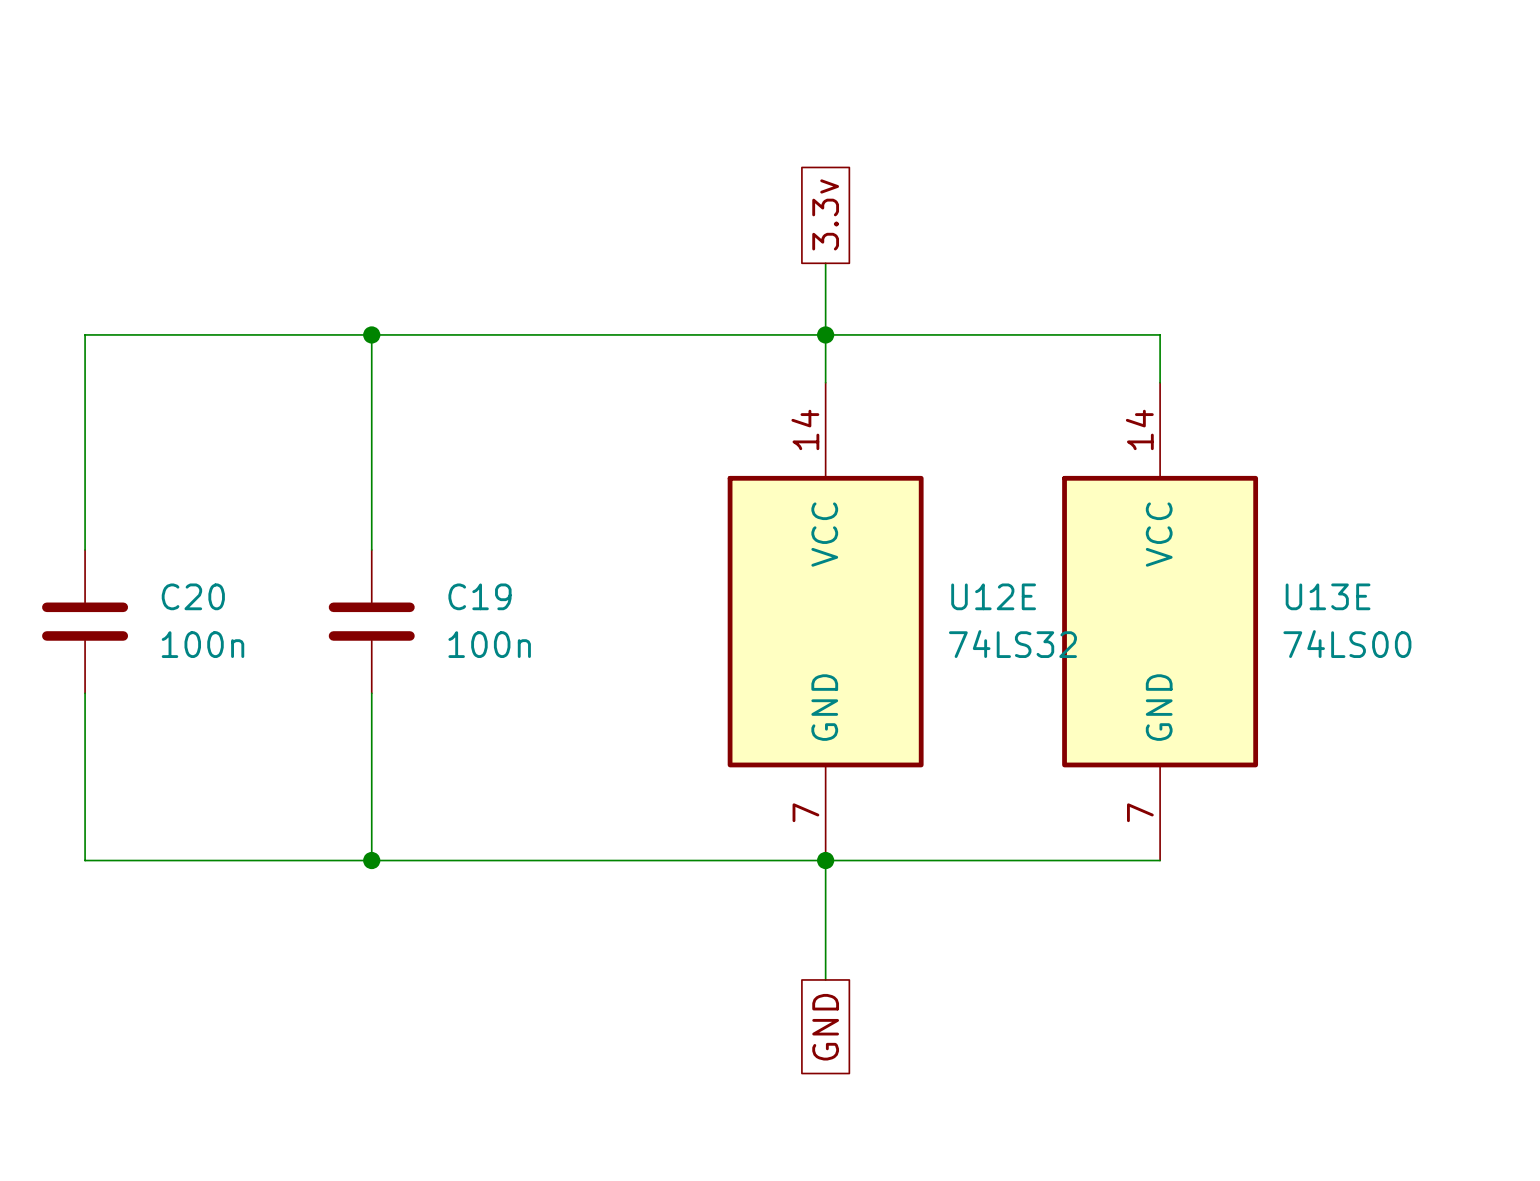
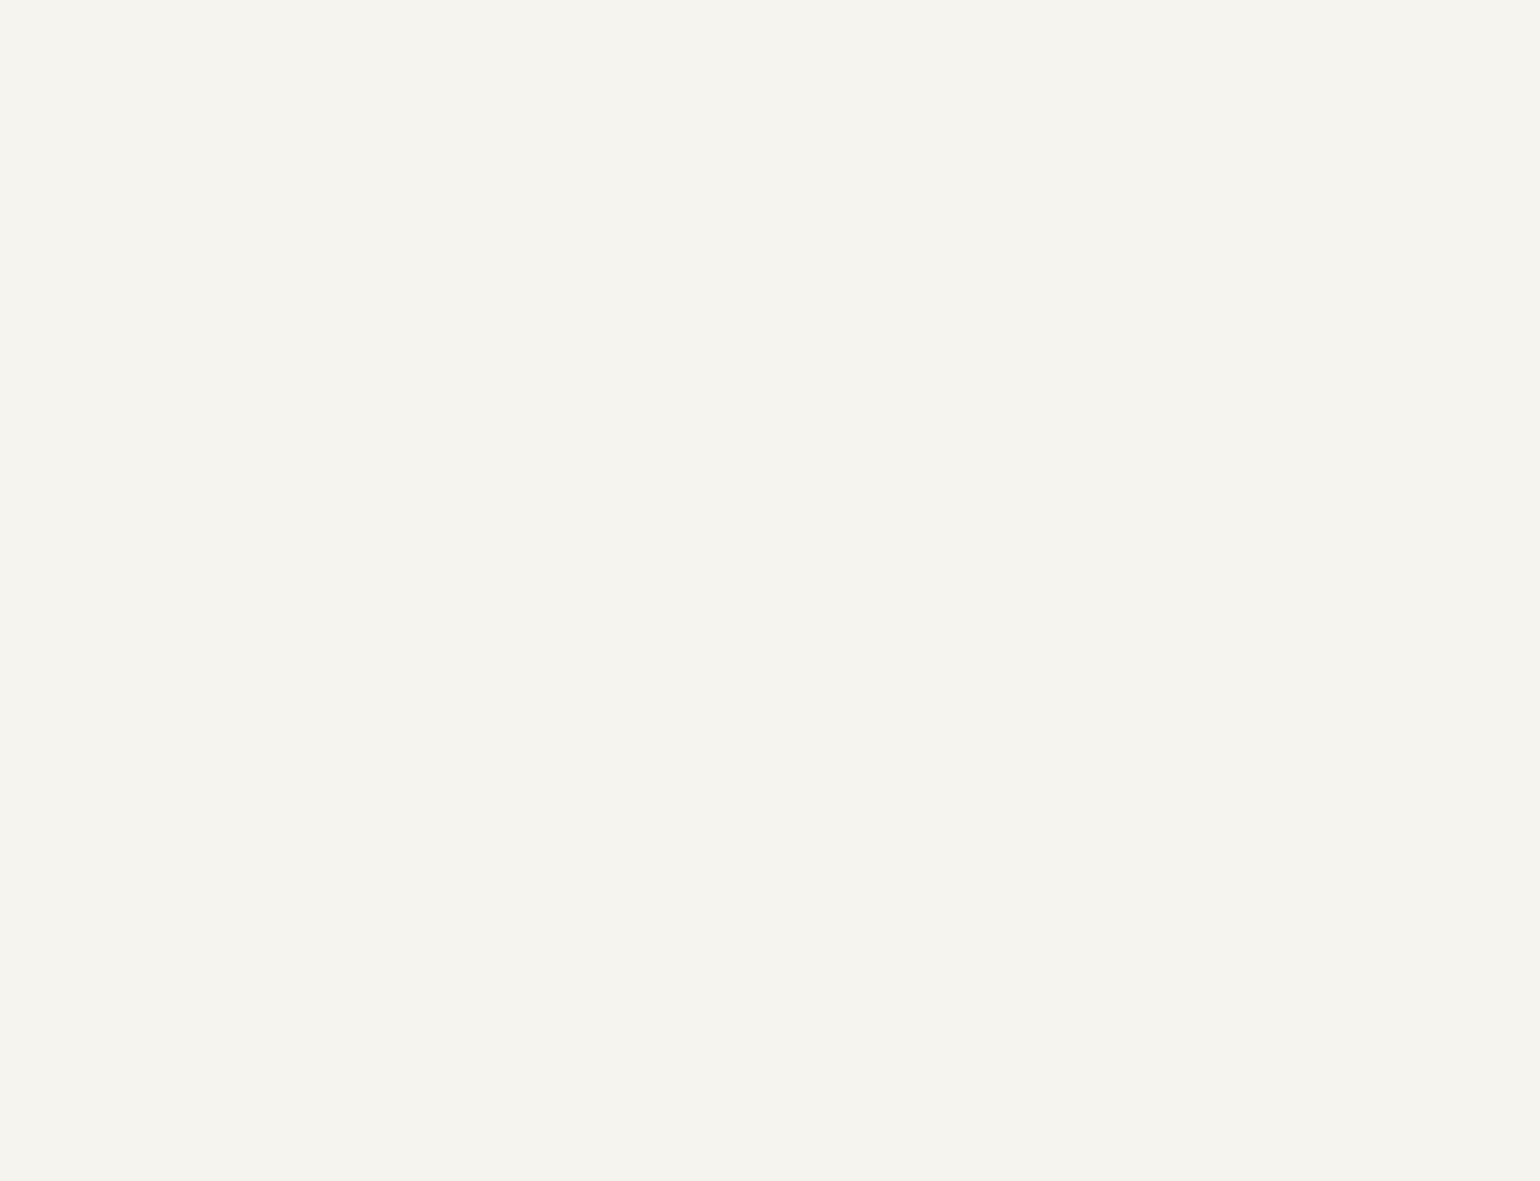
global label: 3.3v (825, 214) -> none
wire: (825, 263) (825, 382) -> none
wire: (371, 334) (371, 549) -> none
junction: (371, 334) -> none
junction: (825, 334) -> none
wire: (1160, 382) (1160, 334) (85, 334) (85, 549) -> none
C20: 100n (85, 621) -> none
C19: 100n (371, 621) -> none
U12E: 74LS32 (825, 621) -> none
U13E: 74LS00 (1160, 621) -> none
wire: (85, 693) (85, 860) (1160, 860) -> none
wire: (371, 693) (371, 860) -> none
junction: (371, 860) -> none
wire: (825, 860) (825, 979) -> none
junction: (825, 860) -> none
global label: GND (825, 1027) -> none

